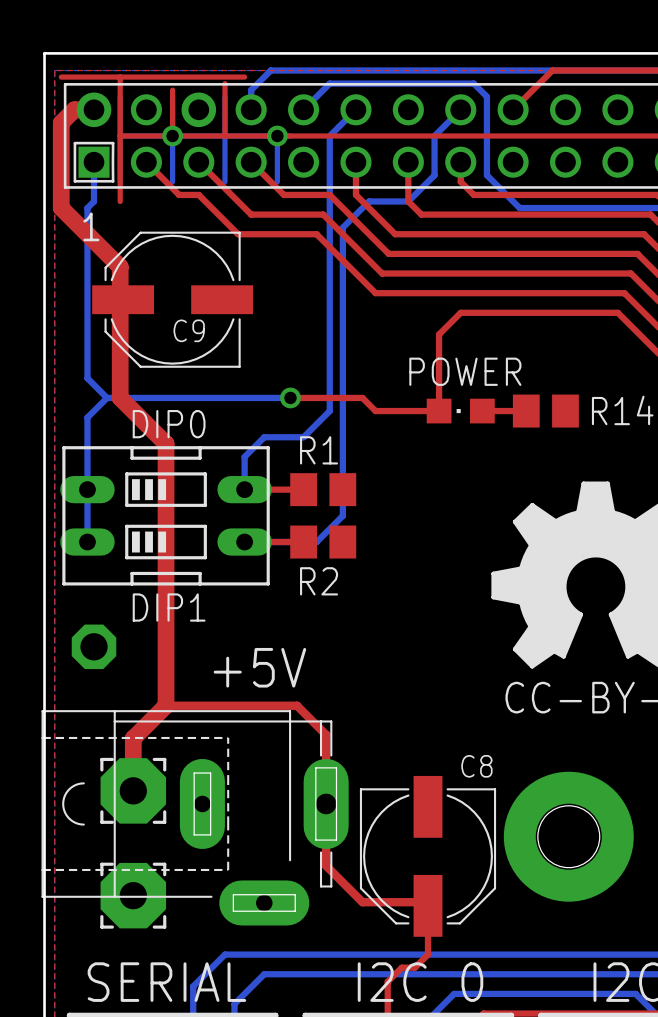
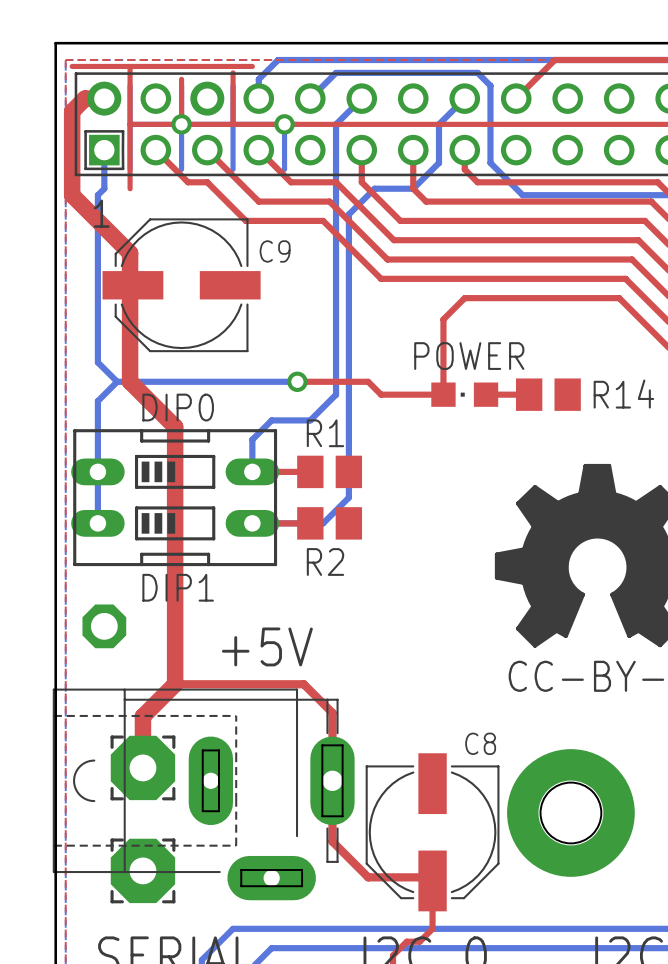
C9 name position: C9 (189, 330) -> C9 (275, 251)

